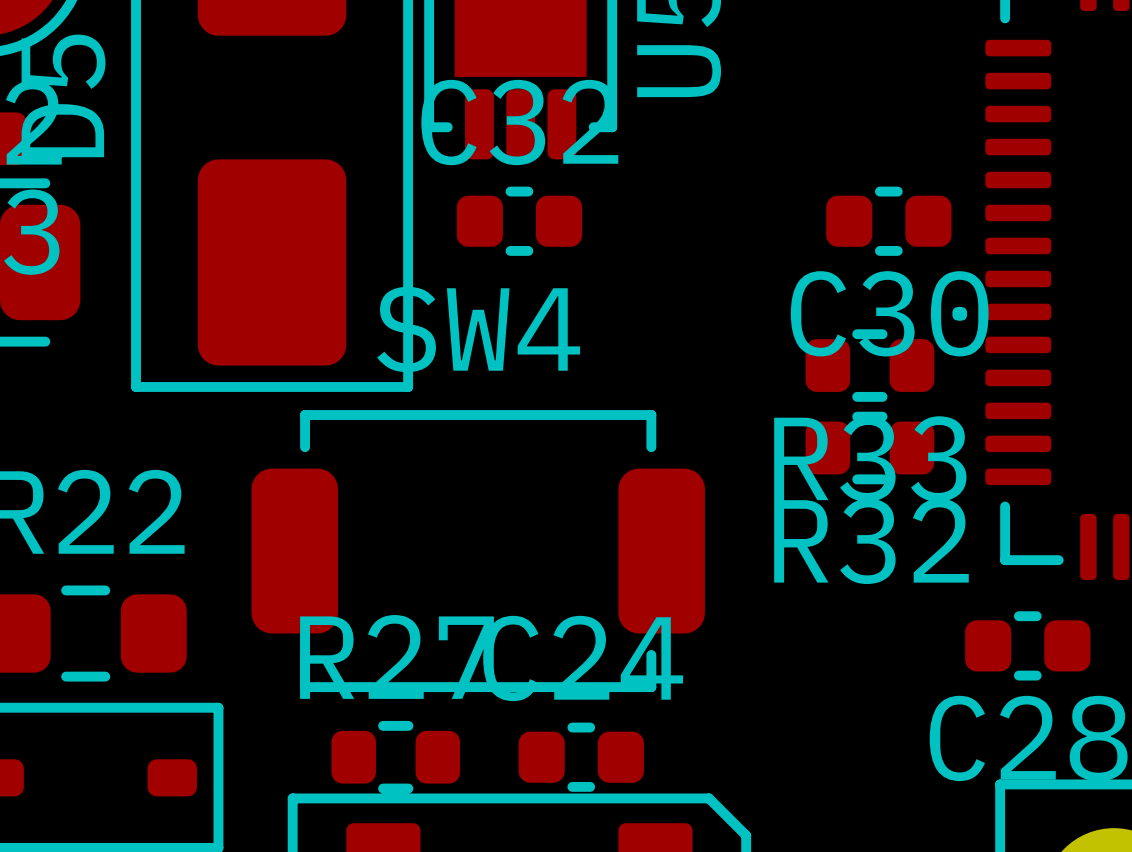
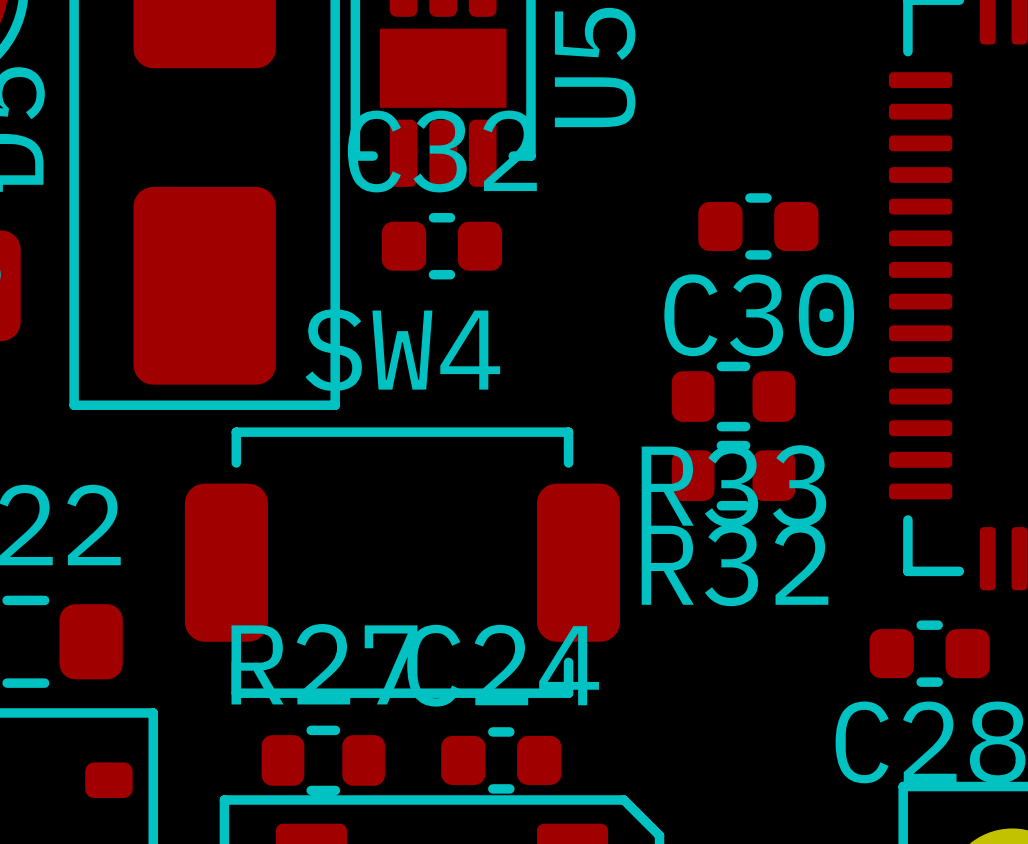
C30 position: (888, 221) -> (758, 226)
R33 position: (869, 365) -> (733, 396)
R32 position: (869, 448) -> (733, 475)

